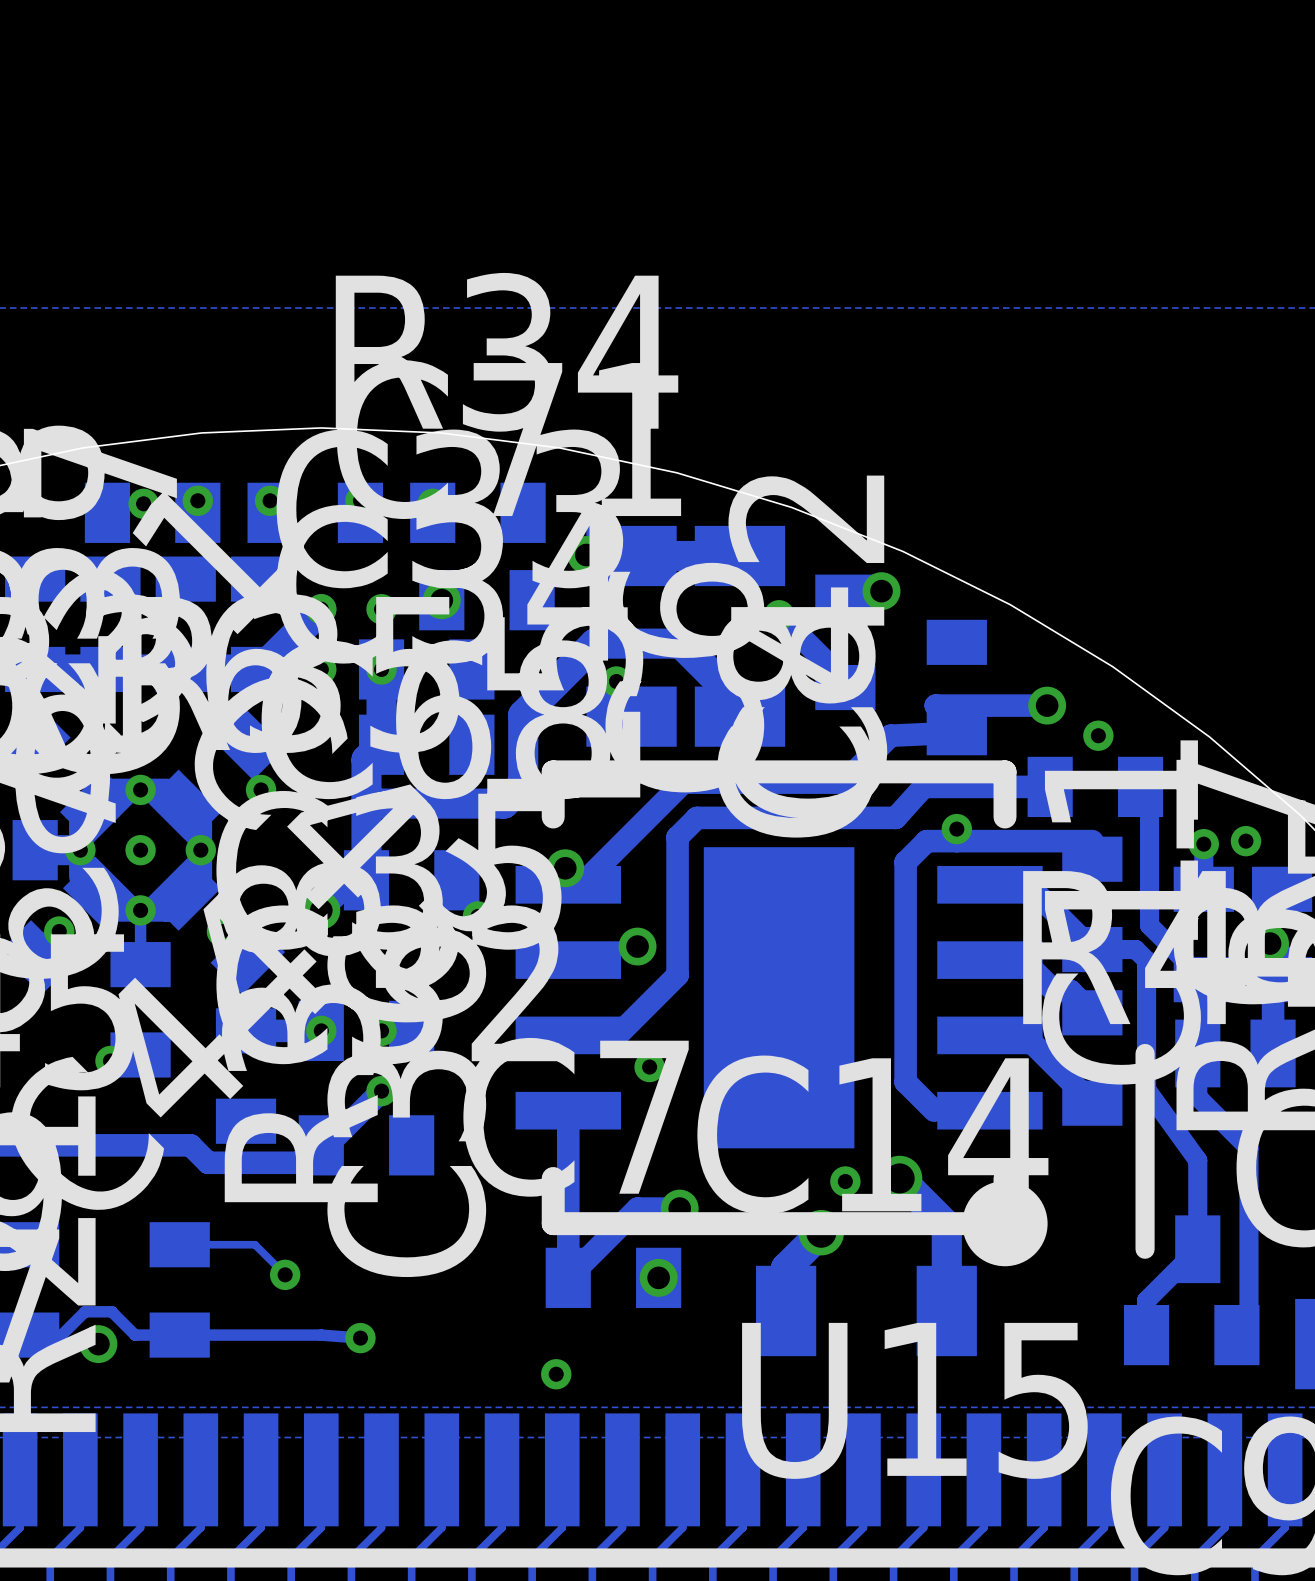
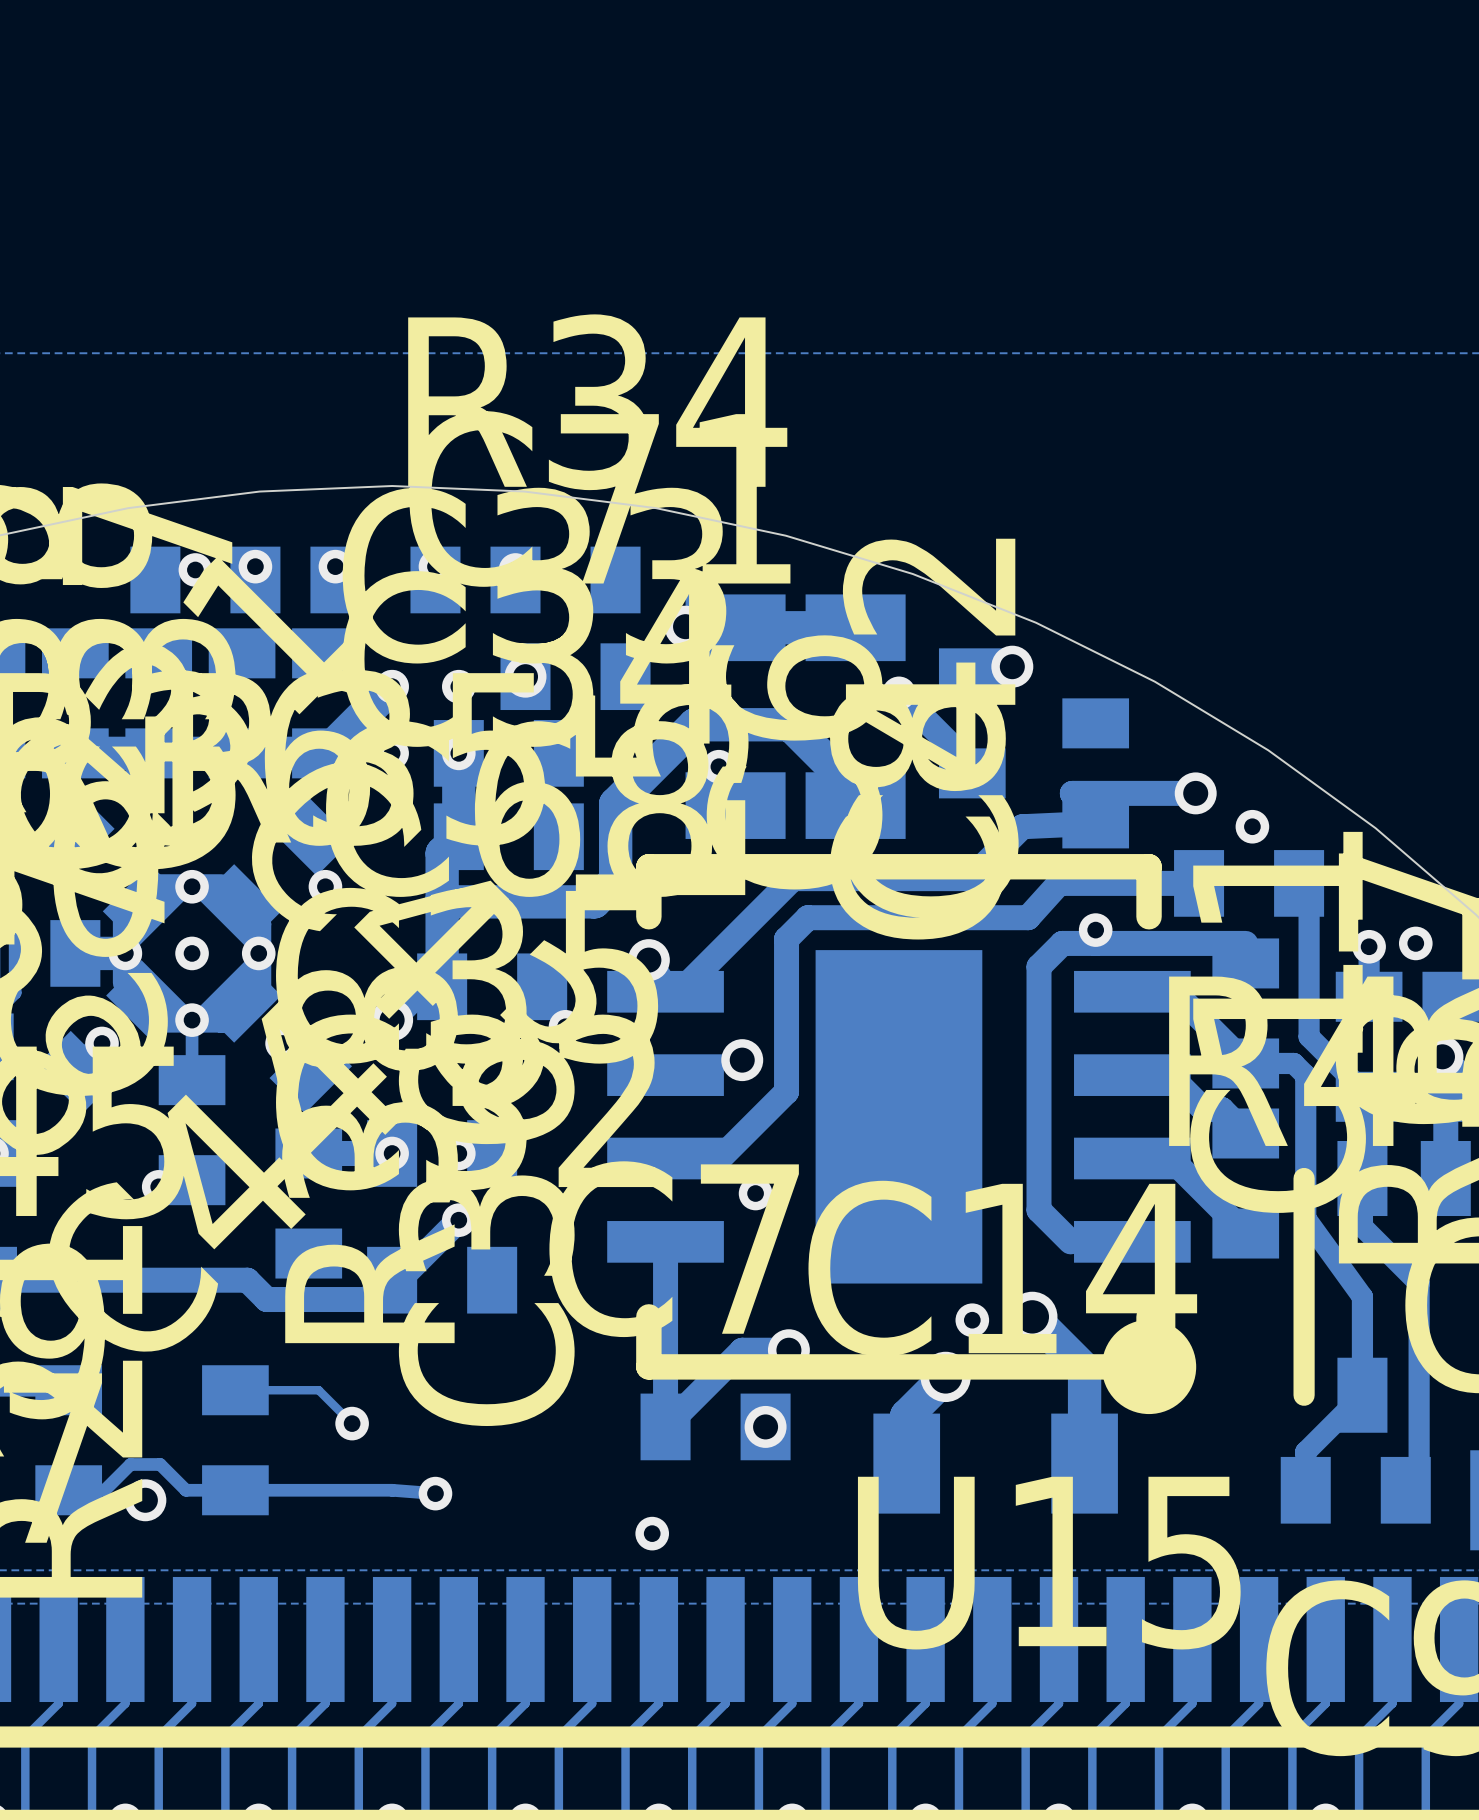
via position: (565, 868) -> (648, 960)

